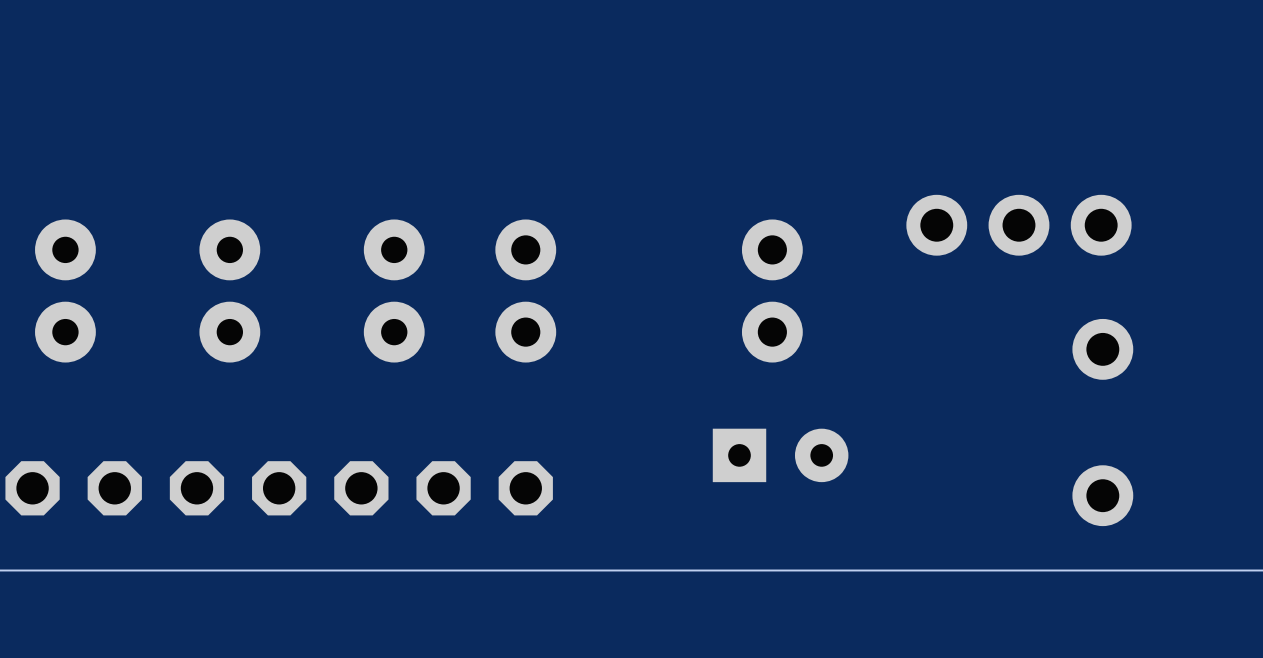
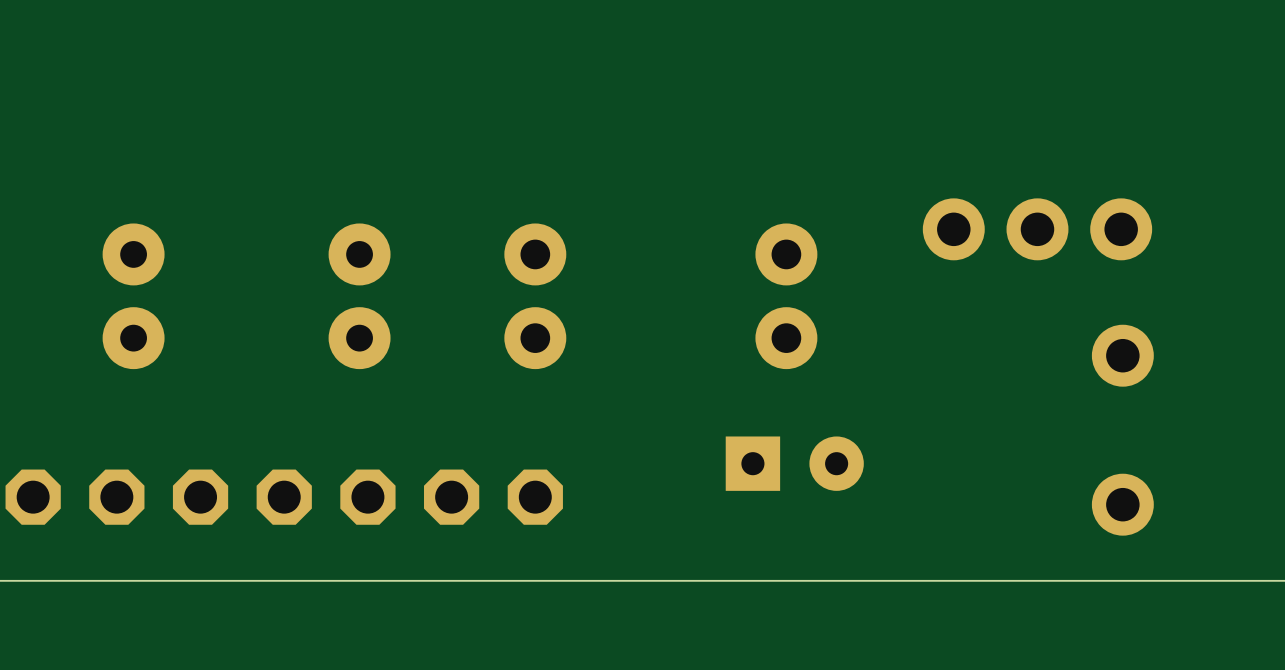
part: (65, 291) -> none
part: none -> (133, 296)
part: (229, 291) -> none
part position: (394, 291) -> (359, 296)

